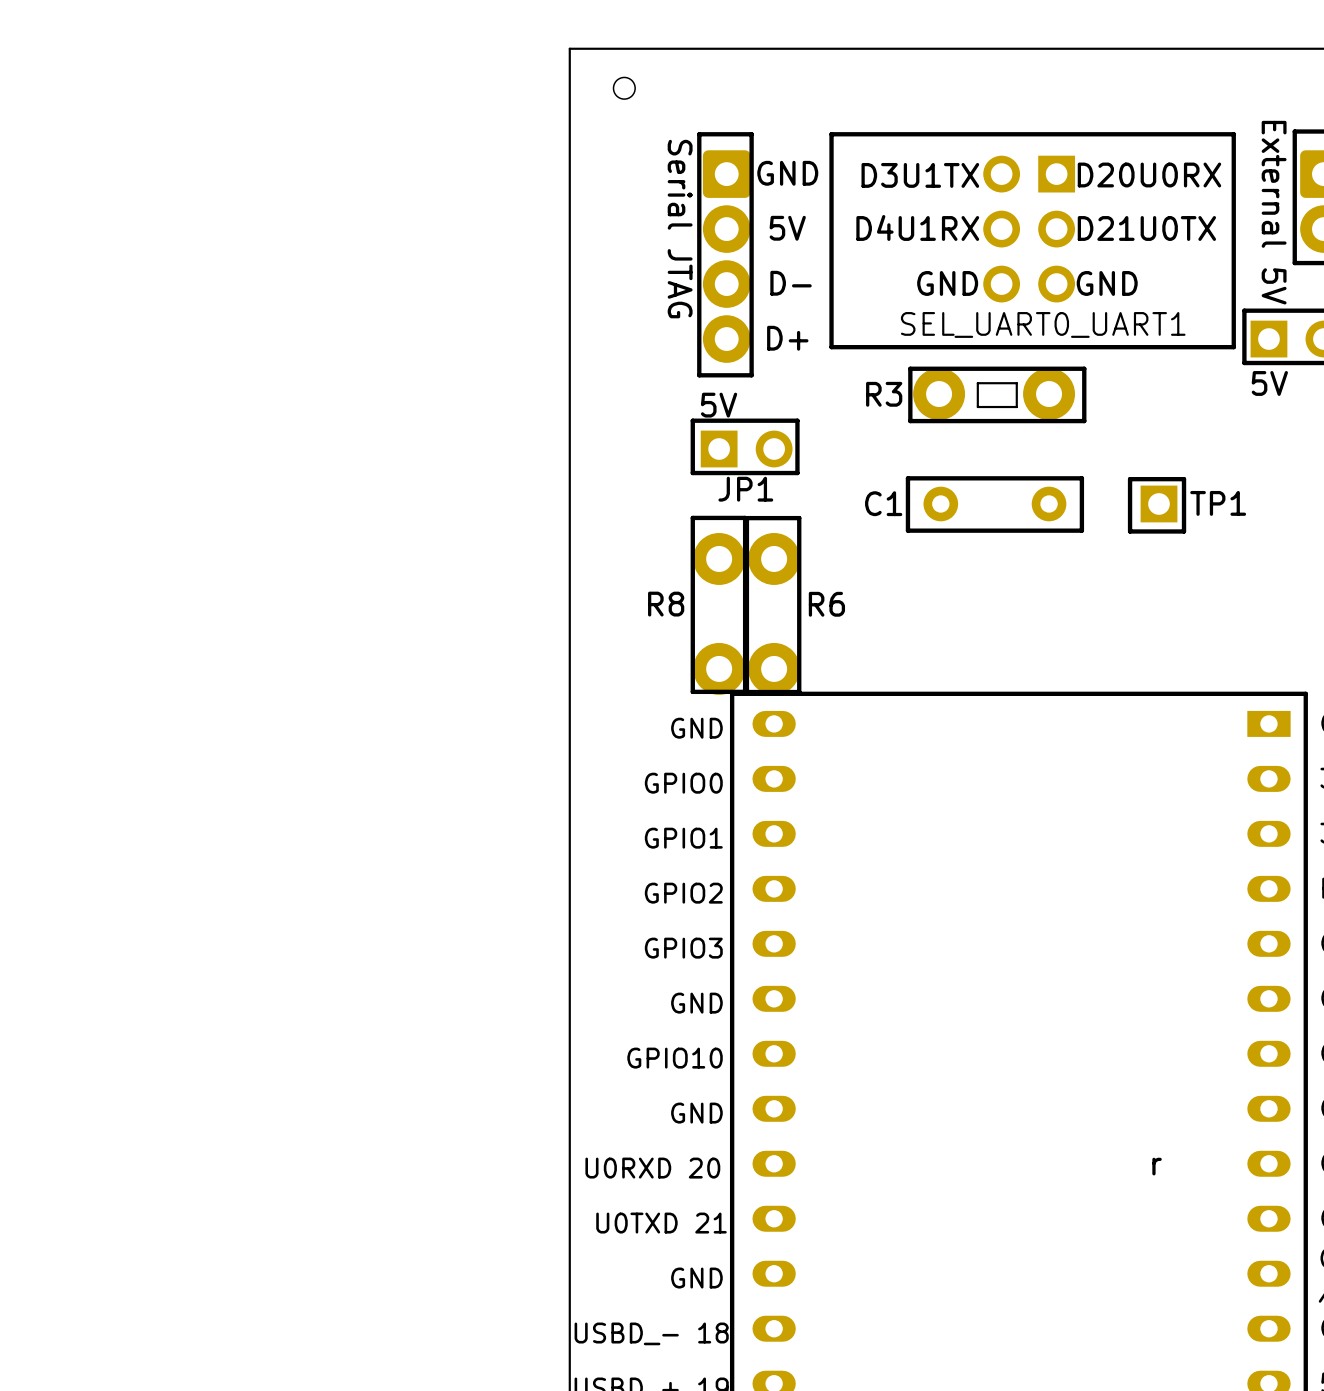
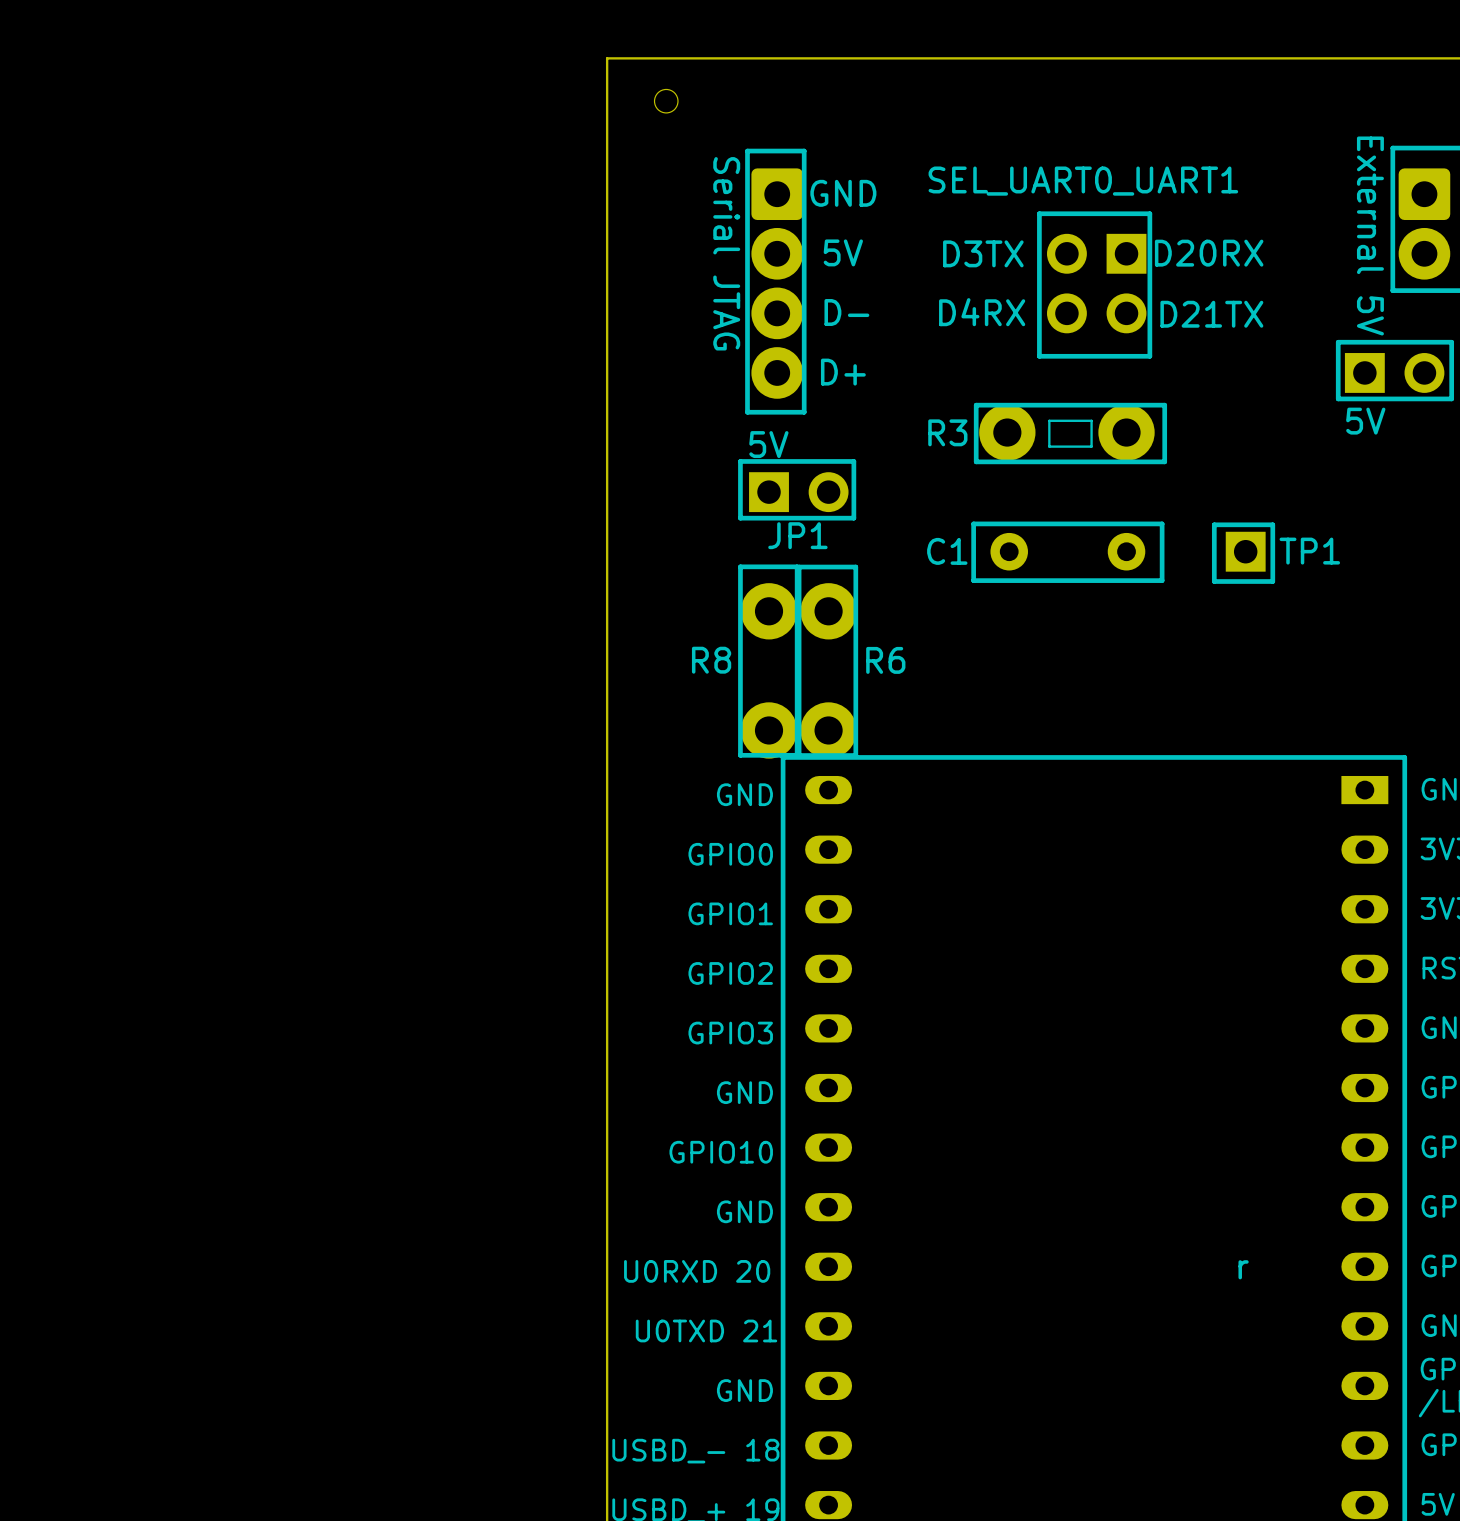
line: (1233, 134) (831, 134) (831, 347) (1233, 347) (1233, 134) -> none
text: D3U1TX (920, 175) -> none
text: D20U0RX (1149, 175) -> none
line: none -> (1149, 213) (1039, 213) (1039, 356) (1149, 356) (1149, 213)
text: D4U1RX (917, 227) -> D3TX (983, 253)
text: D21U0TX (1146, 228) -> D20RX (1209, 253)
part: (1029, 229) -> none
part: none -> (1096, 283)
text: none -> D4RX (982, 312)
text: GND (947, 283) -> none
text: GND (1107, 283) -> D21TX (1211, 314)
text position: SEL_UART0_UART1 (1043, 324) -> SEL_UART0_UART1 (1083, 181)

